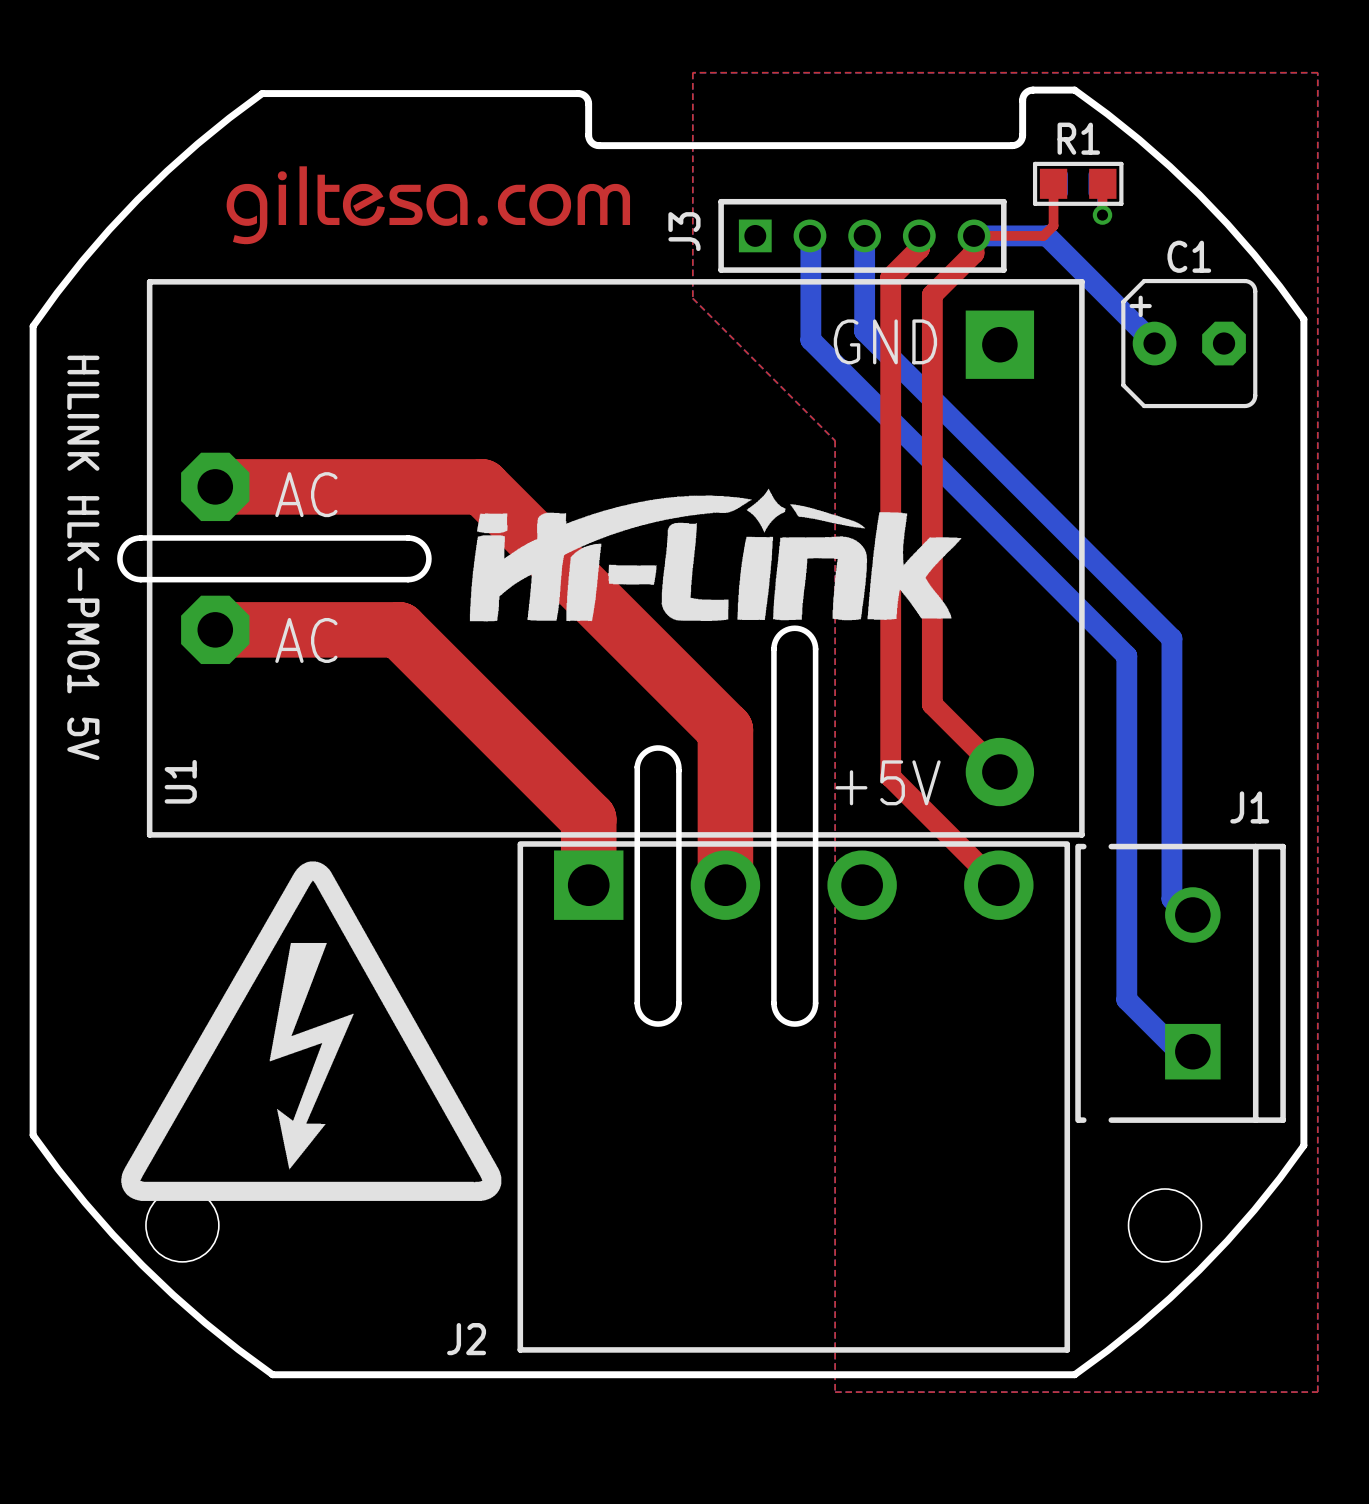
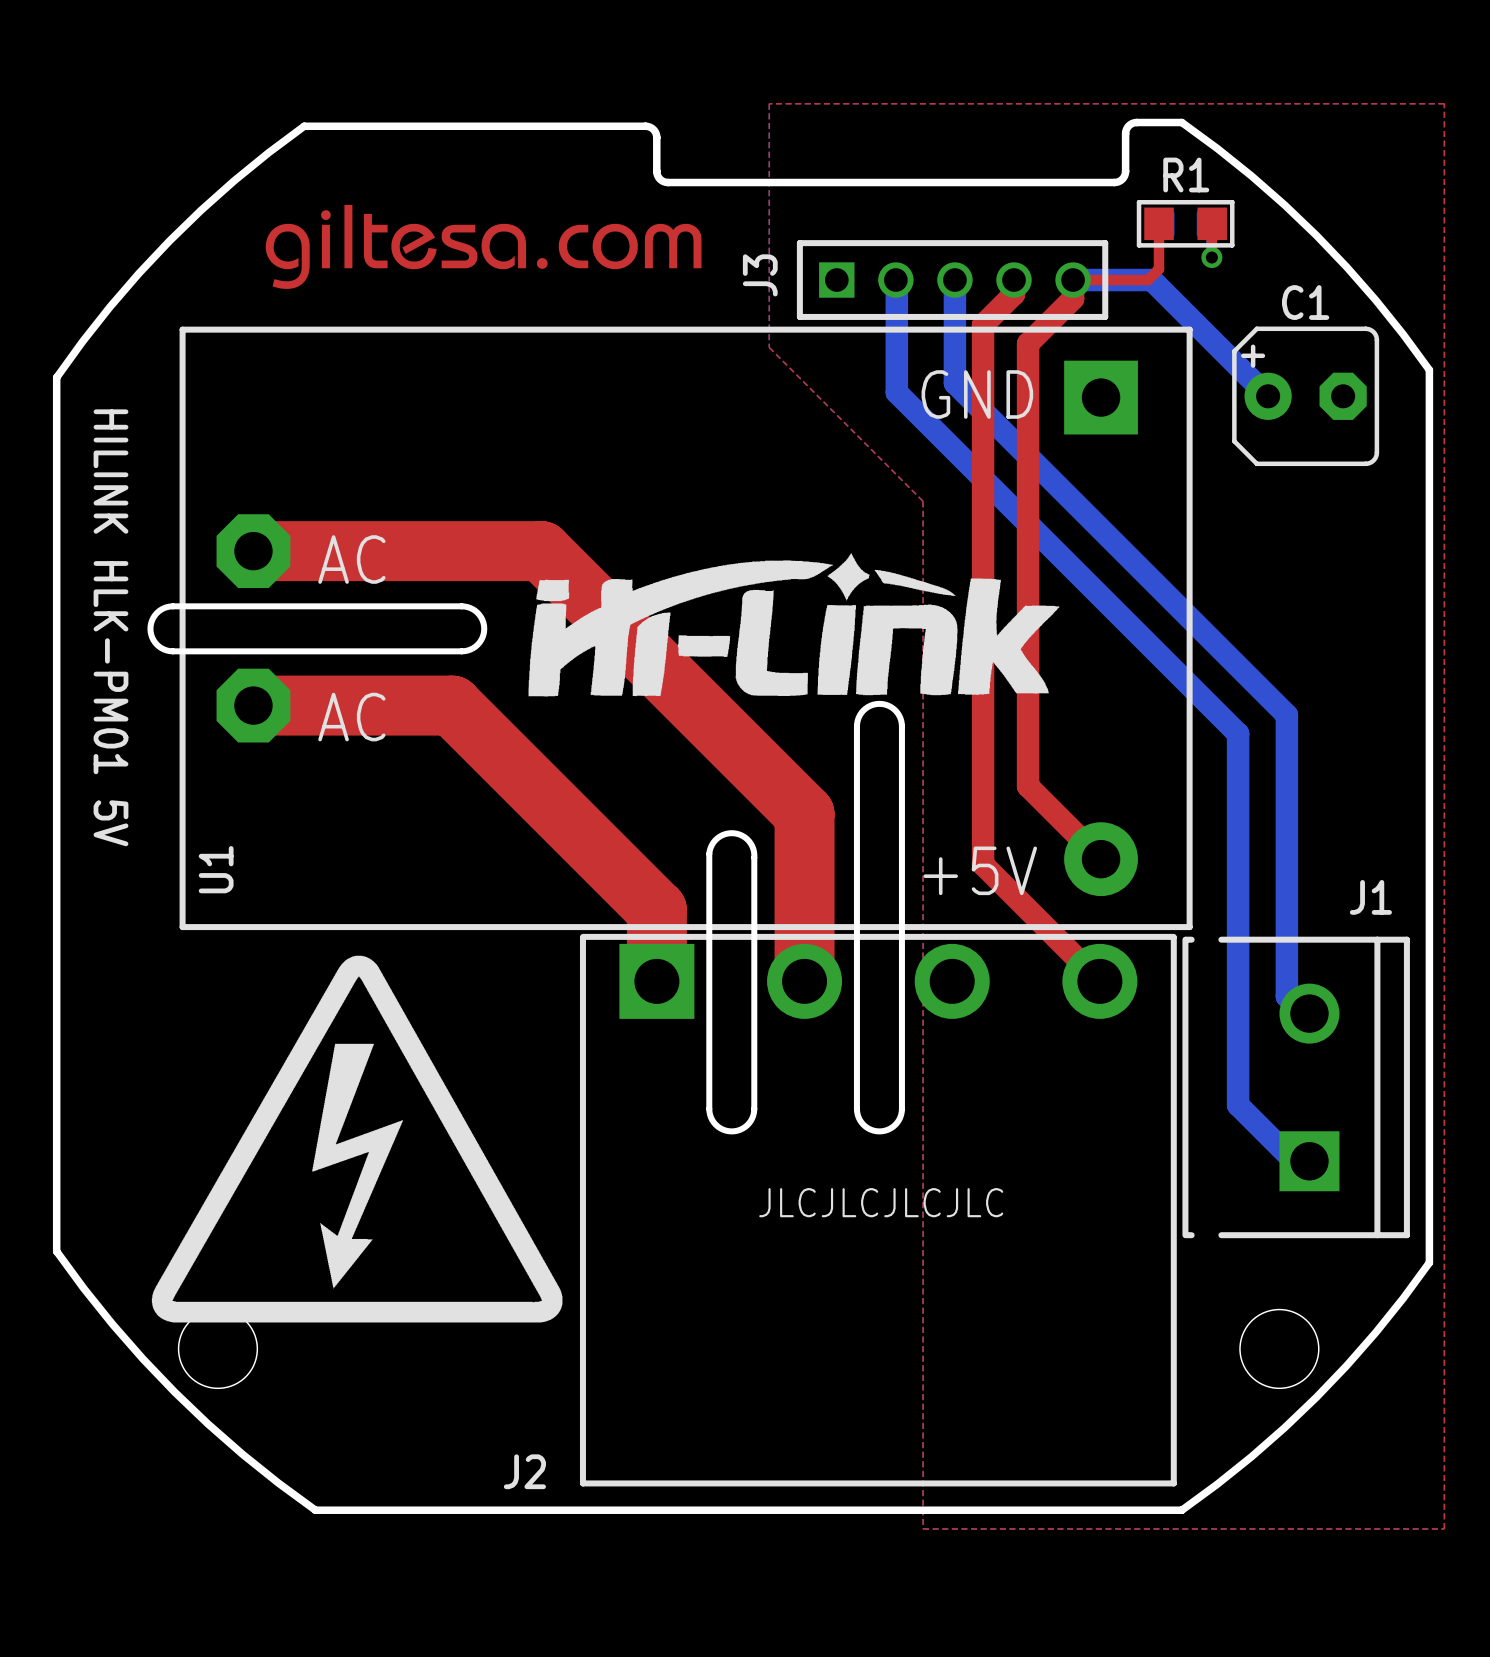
text: none -> JLCJLCJLCJLC (881, 1202)

